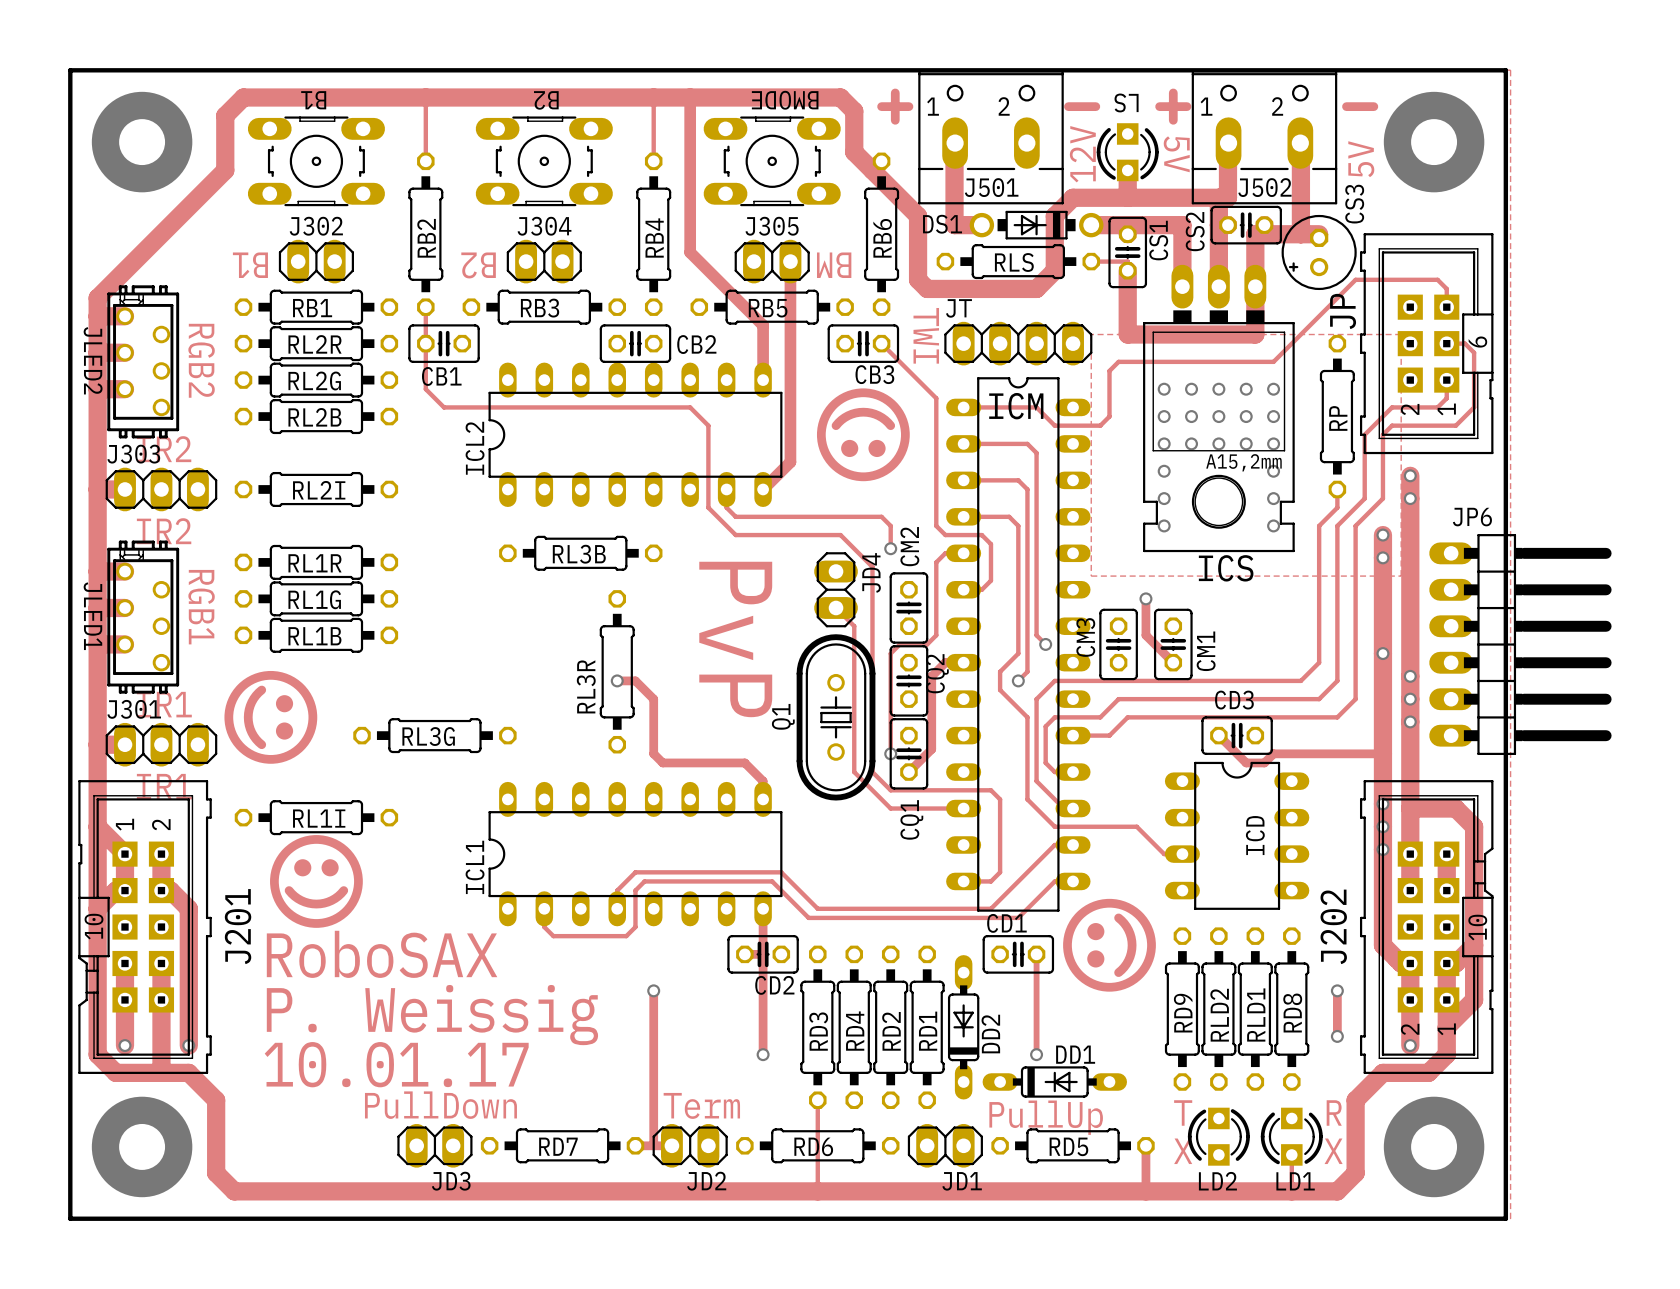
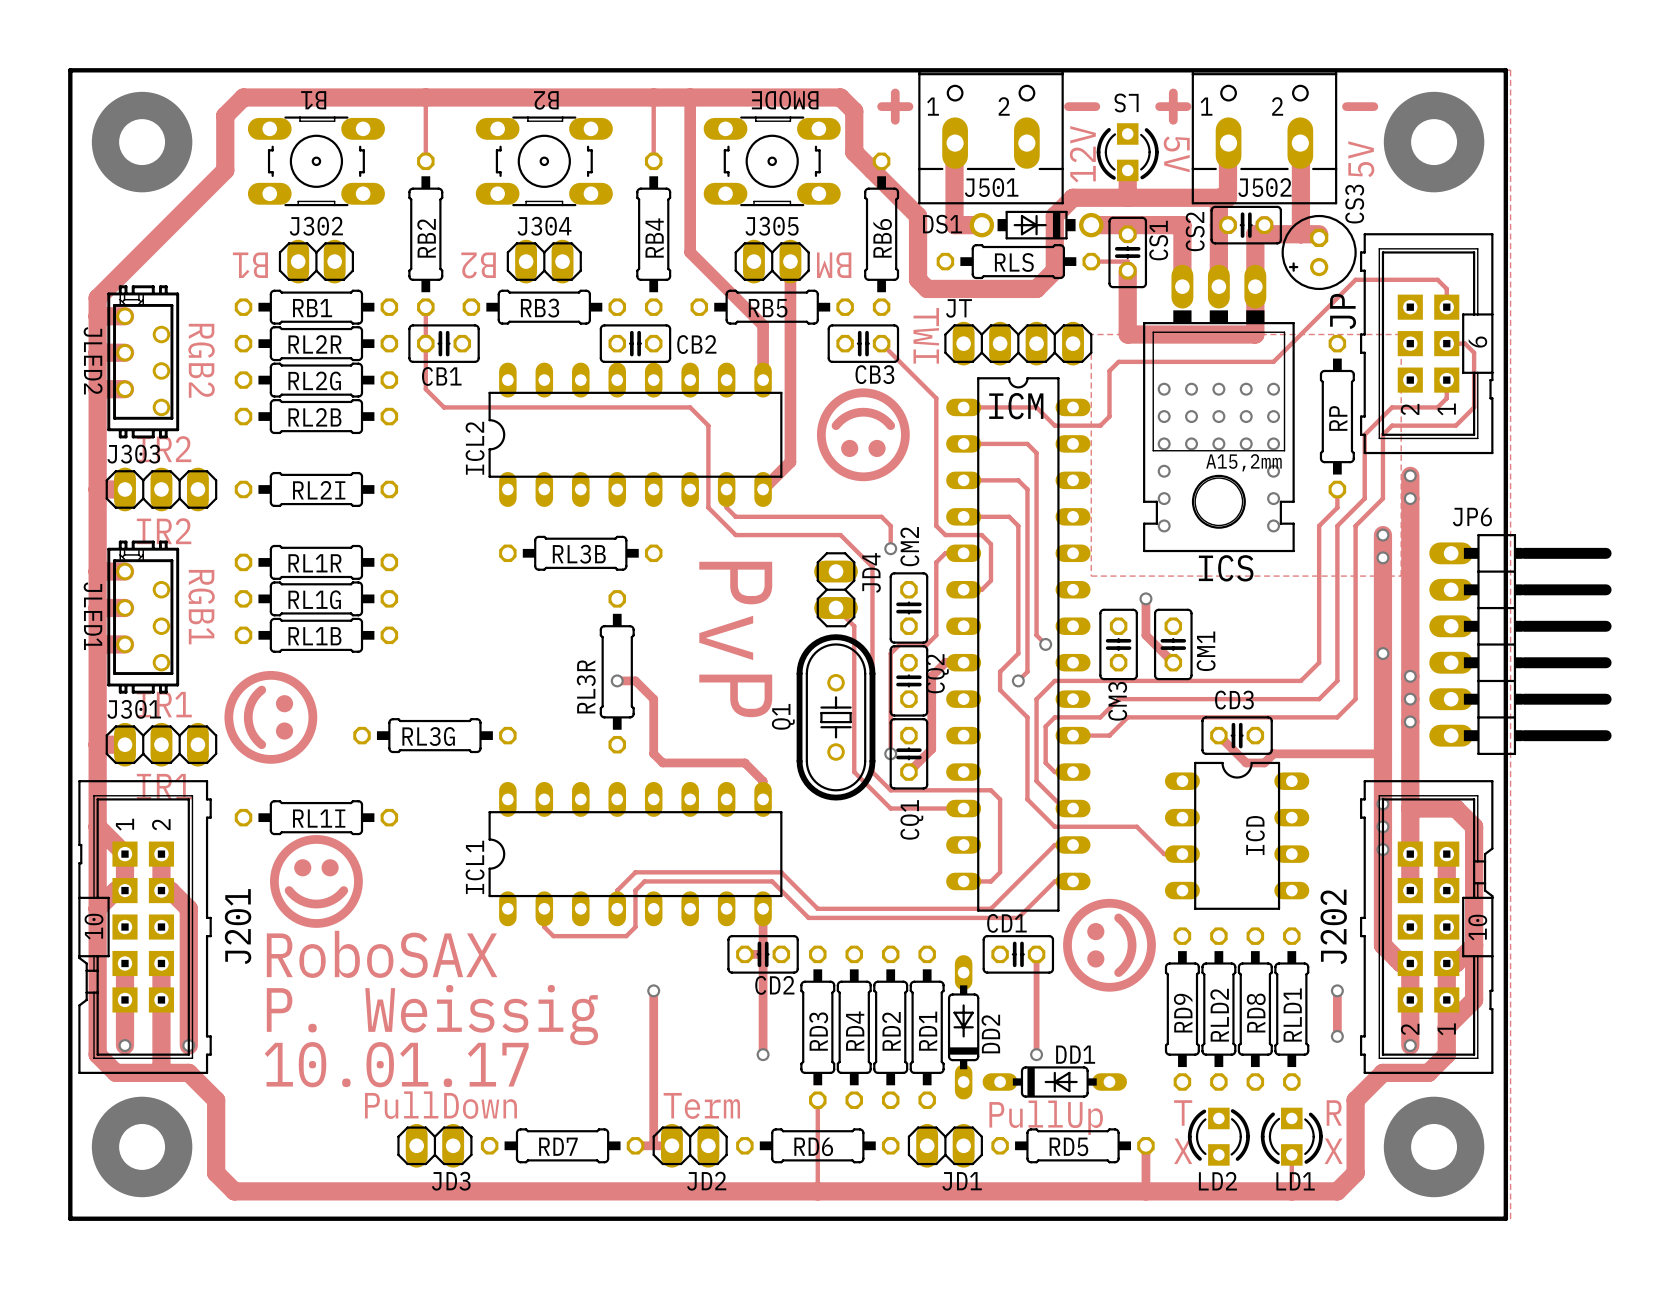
CM3 name position: CM3 (1085, 637) -> CM3 (1117, 701)
RD8 name position: RD8 (1292, 1013) -> RD8 (1256, 1013)
RLD1 name position: RLD1 (1256, 1015) -> RLD1 (1292, 1015)

